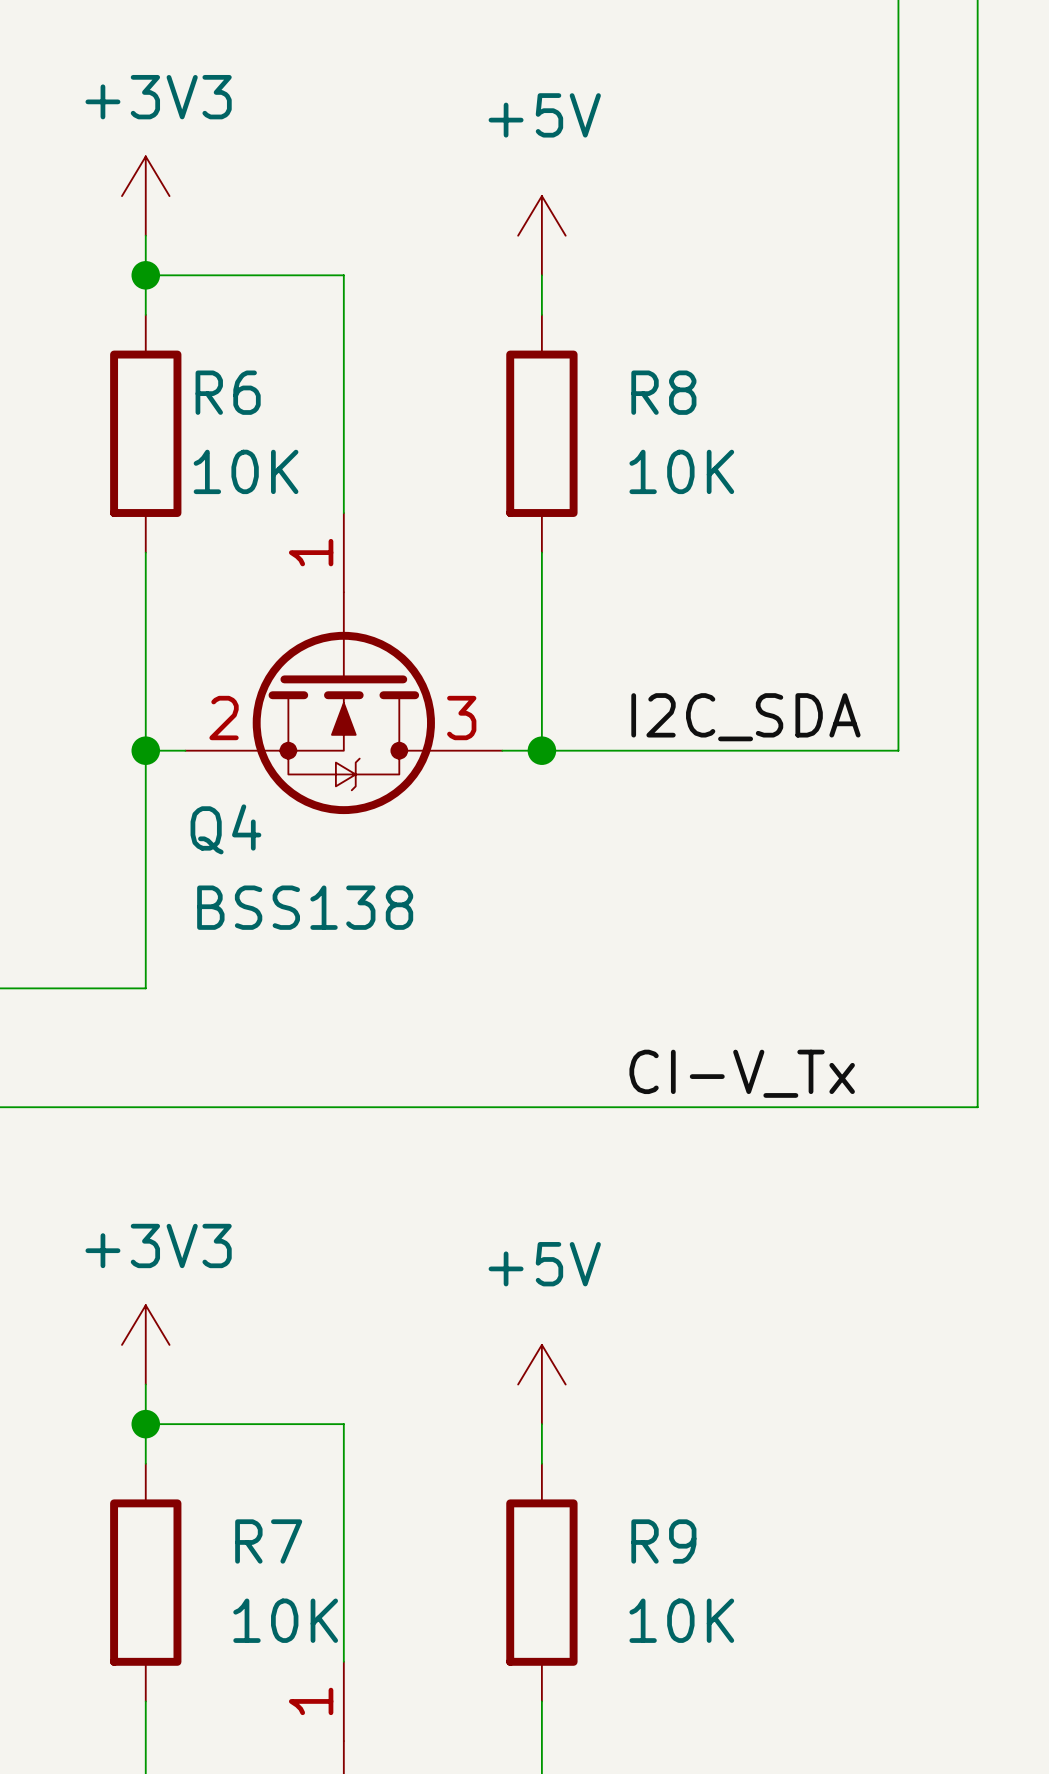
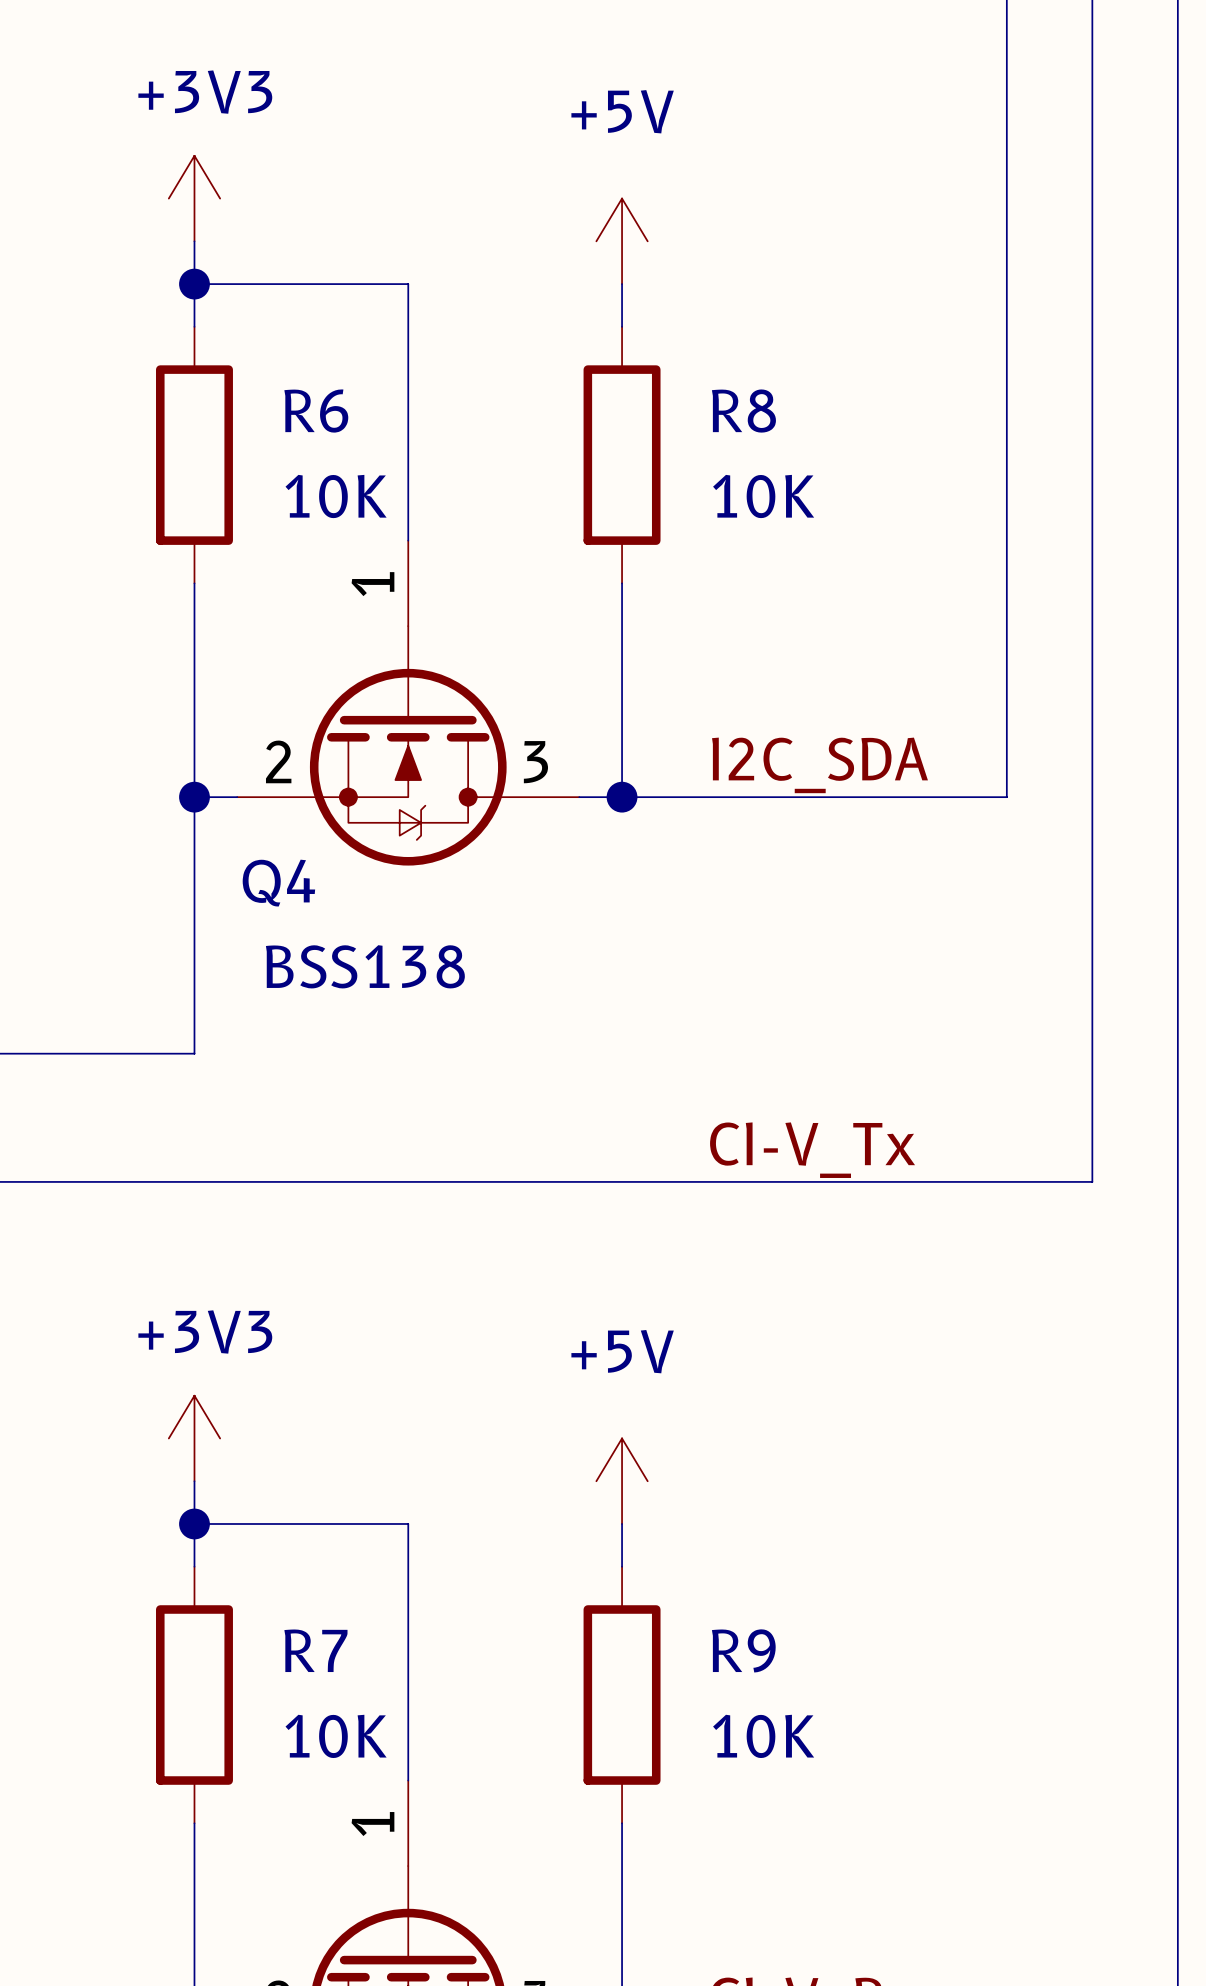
R6 name position: R6 (228, 392) -> R6 (316, 411)
R6 value position: 10K (246, 471) -> 10K (336, 496)

